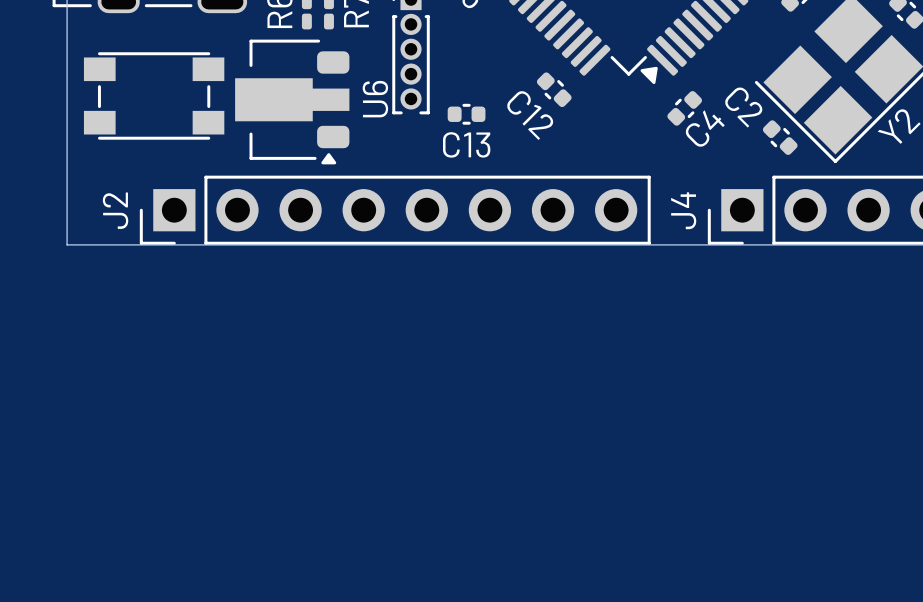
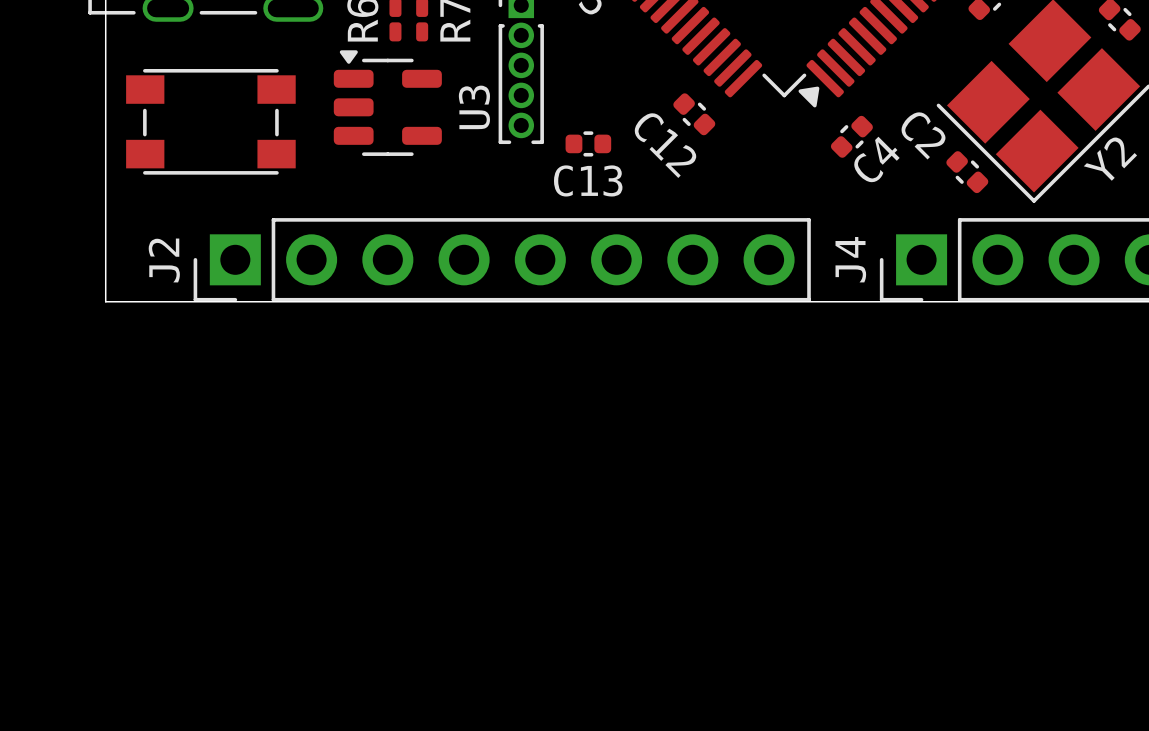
U3: none -> (387, 103)
U6: (292, 101) -> none

